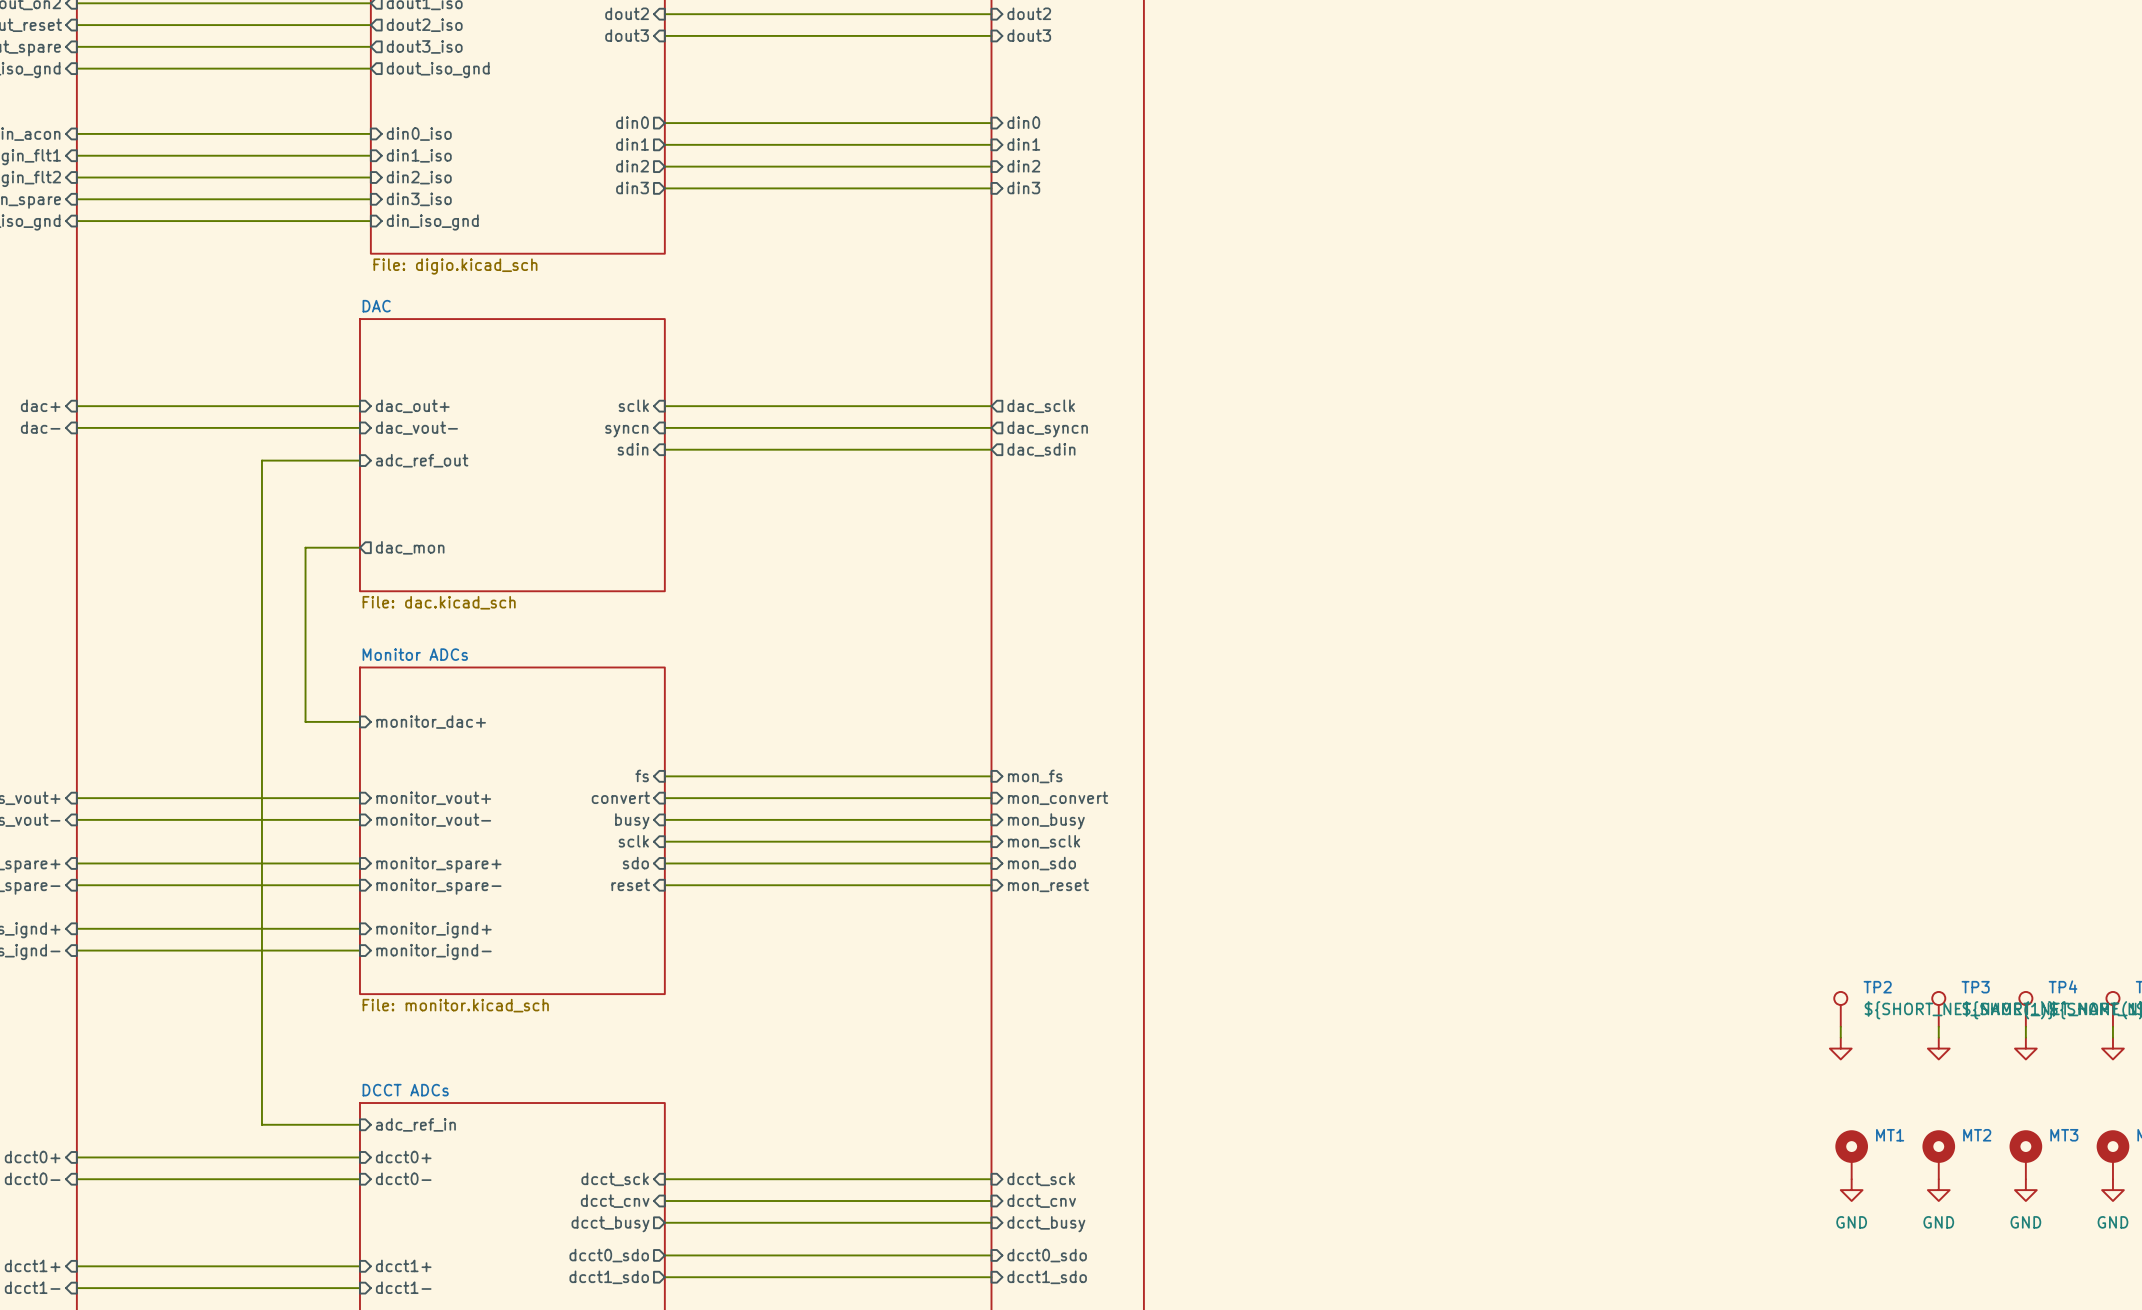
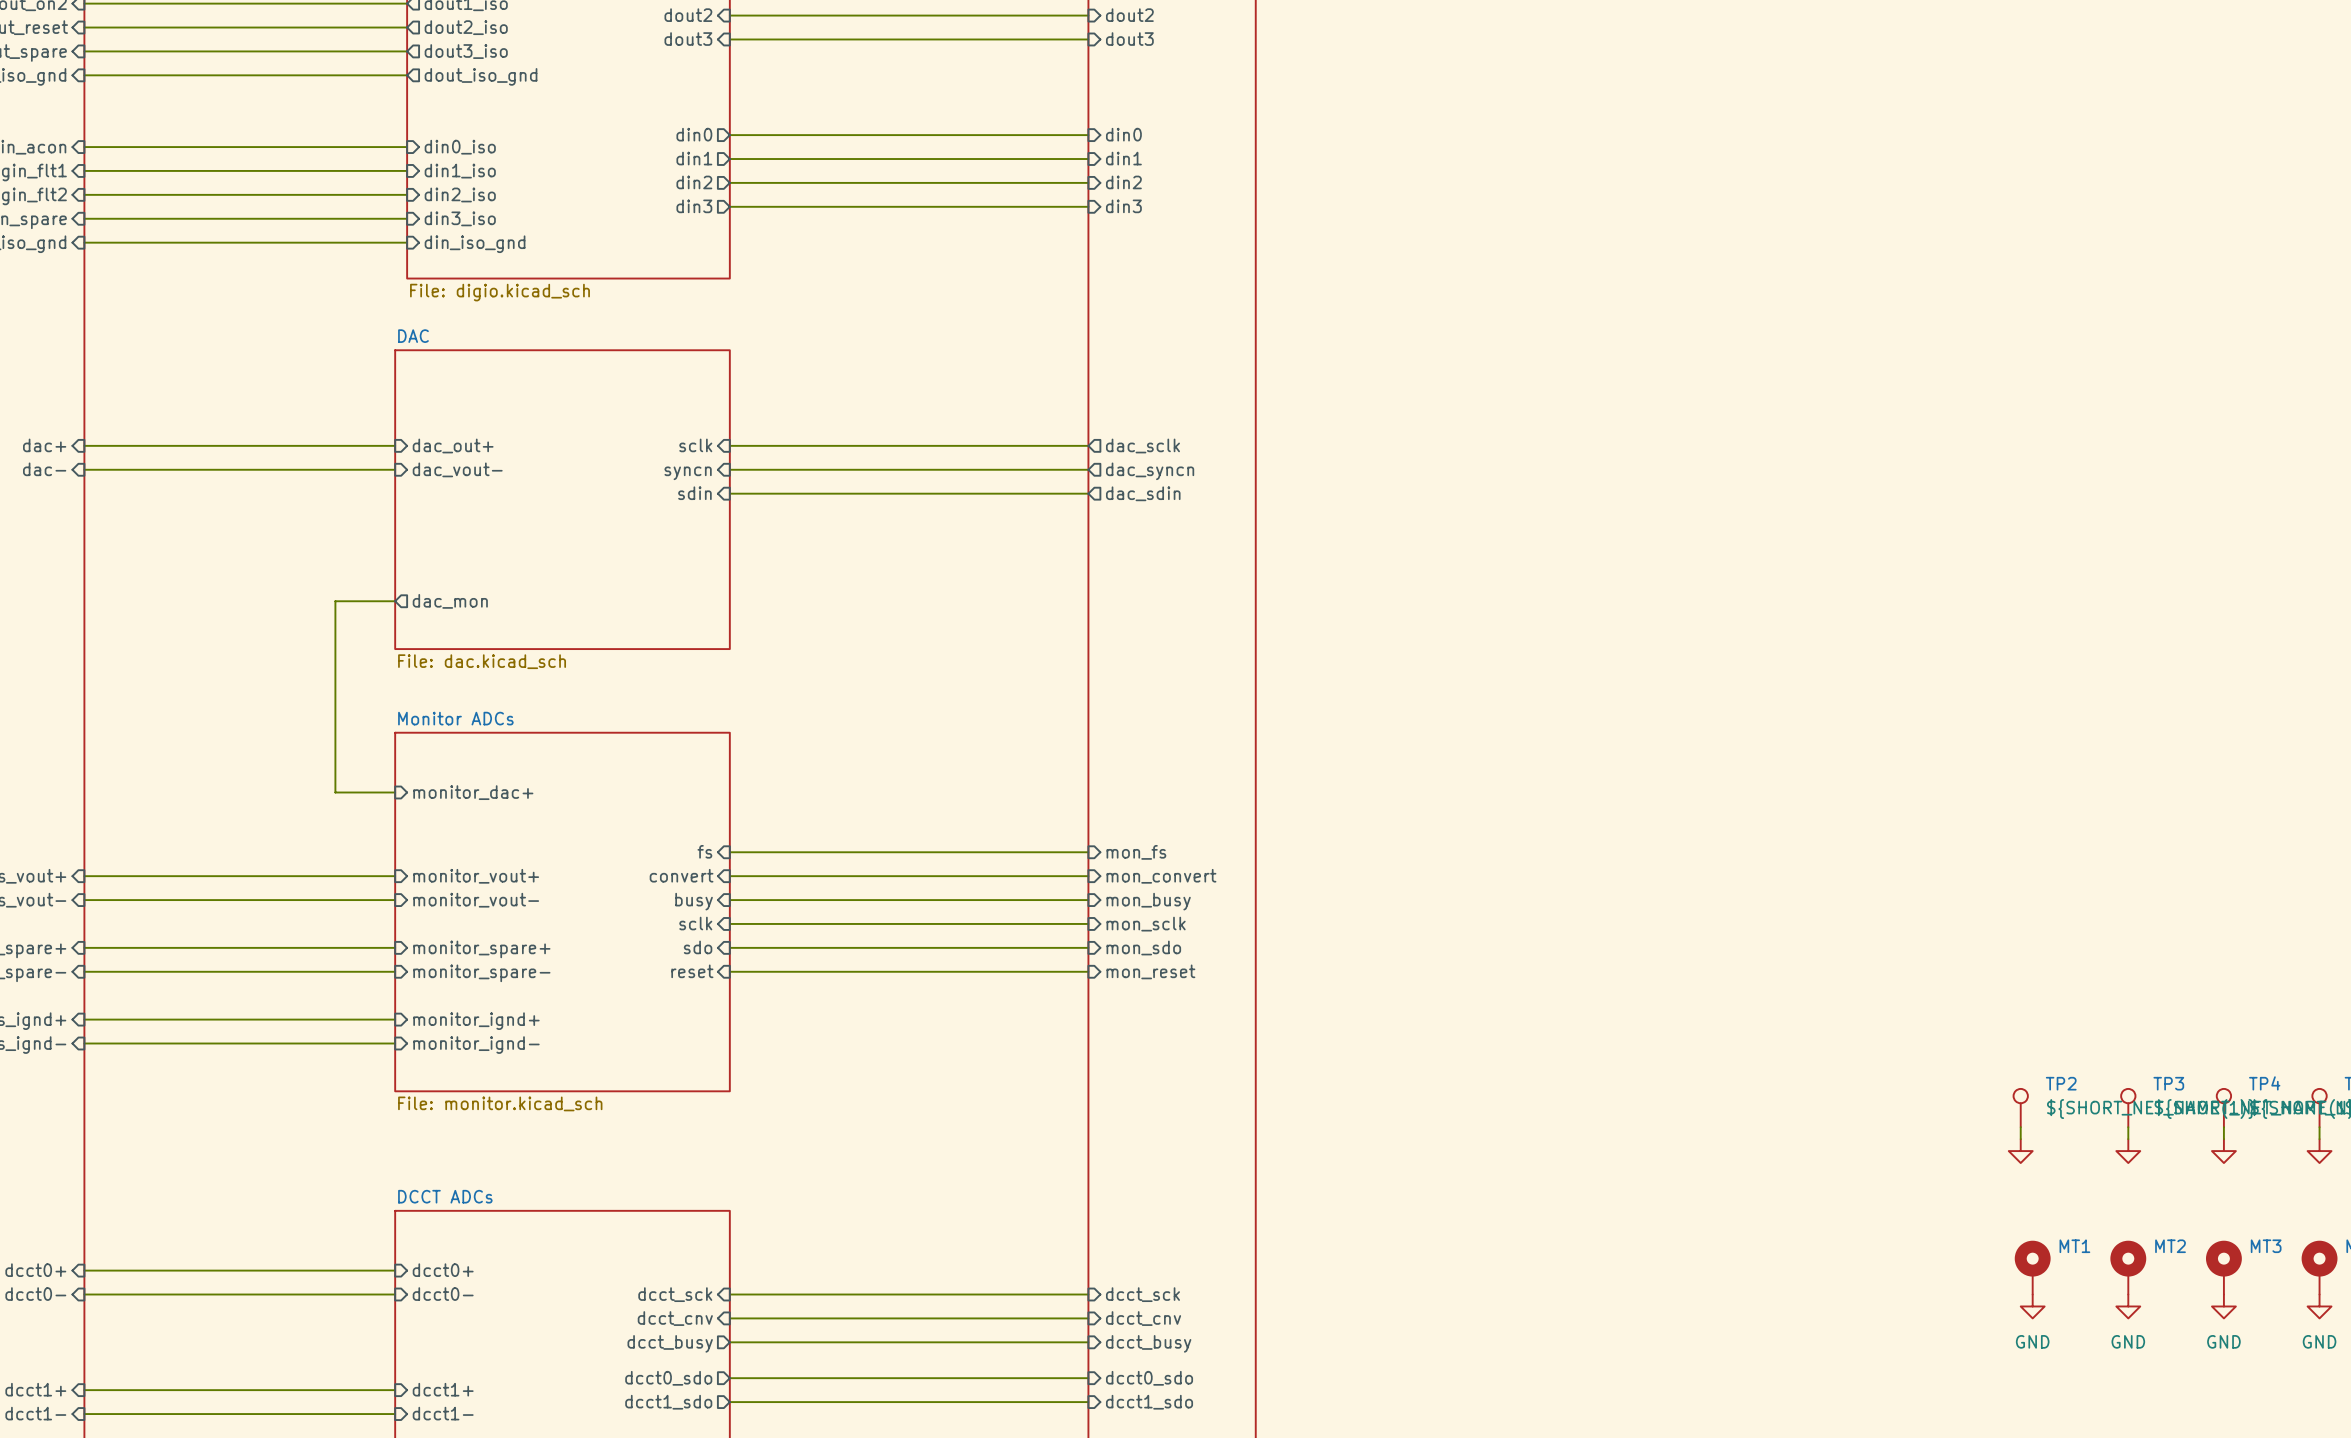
wire: (359, 460) (261, 460) (261, 1124) (359, 1124) -> none
sheet pin: adc_ref_out (422, 460) -> none
sheet pin: adc_ref_in (415, 1124) -> none

